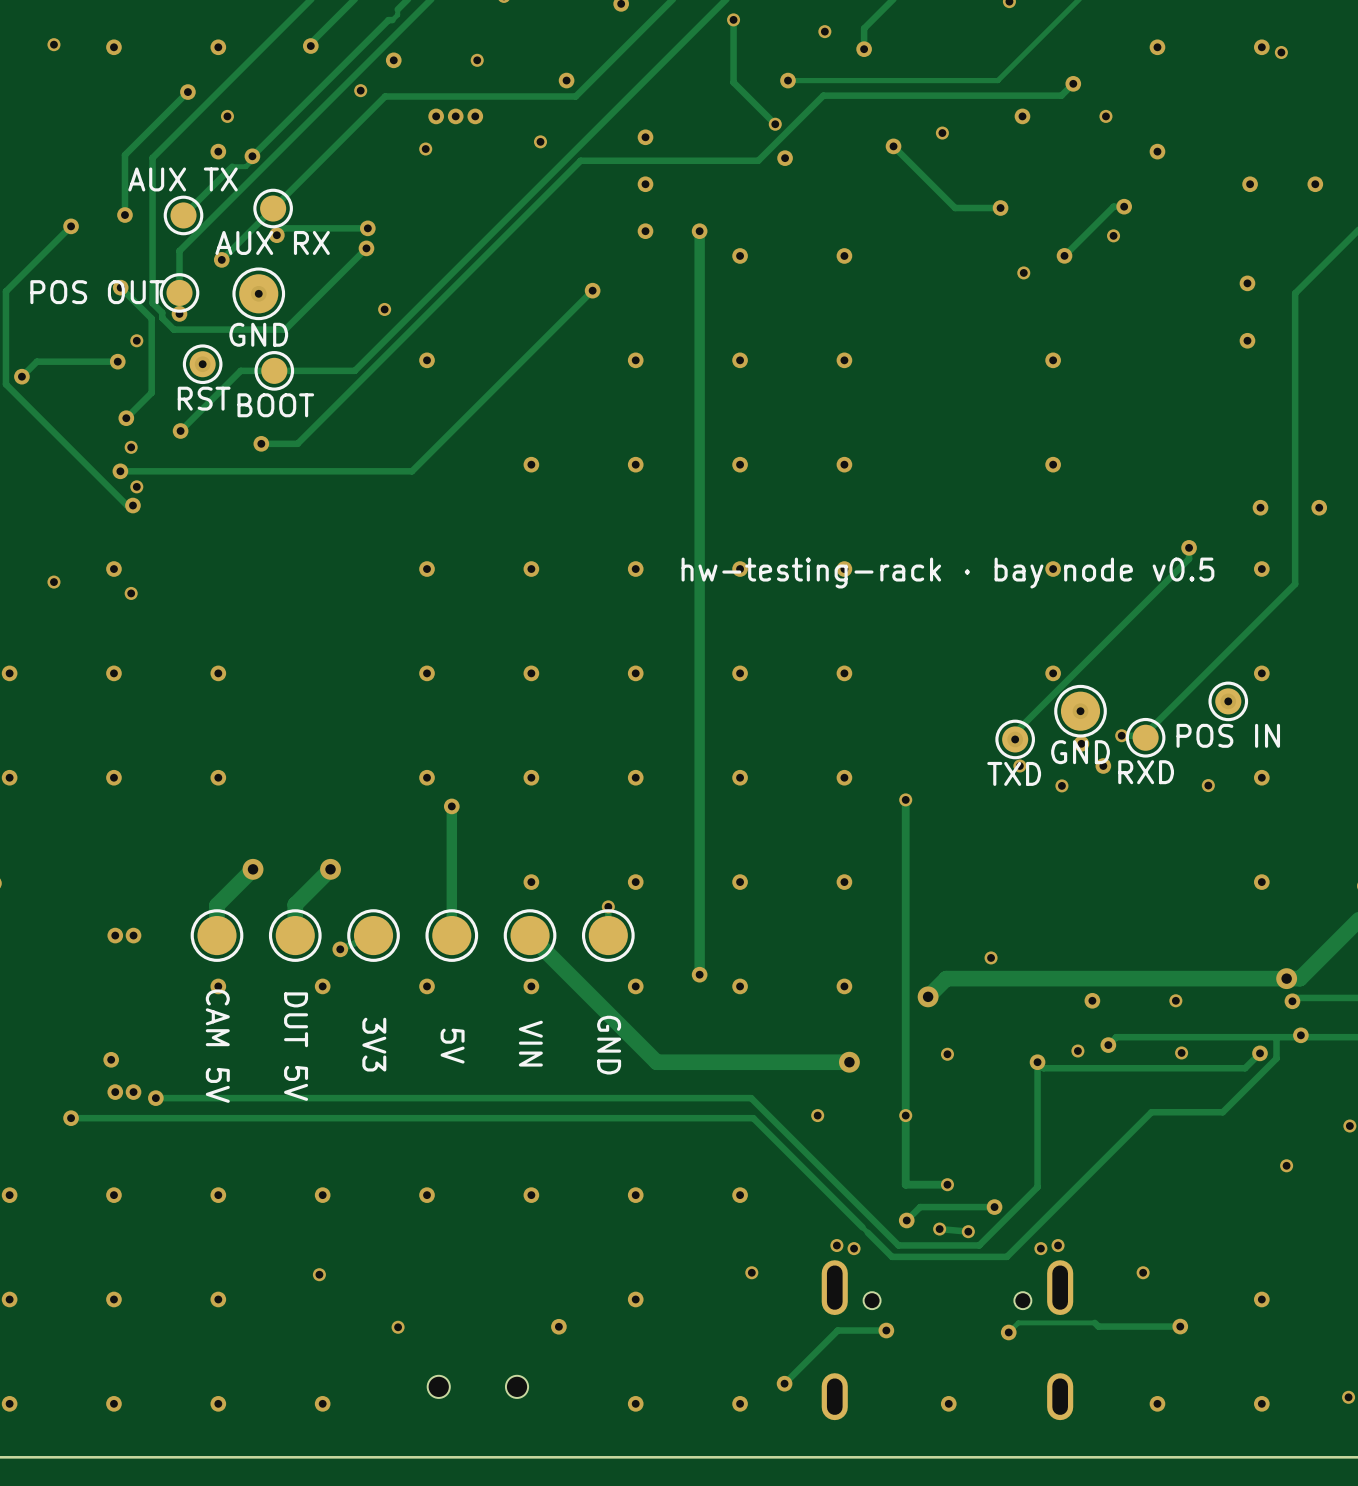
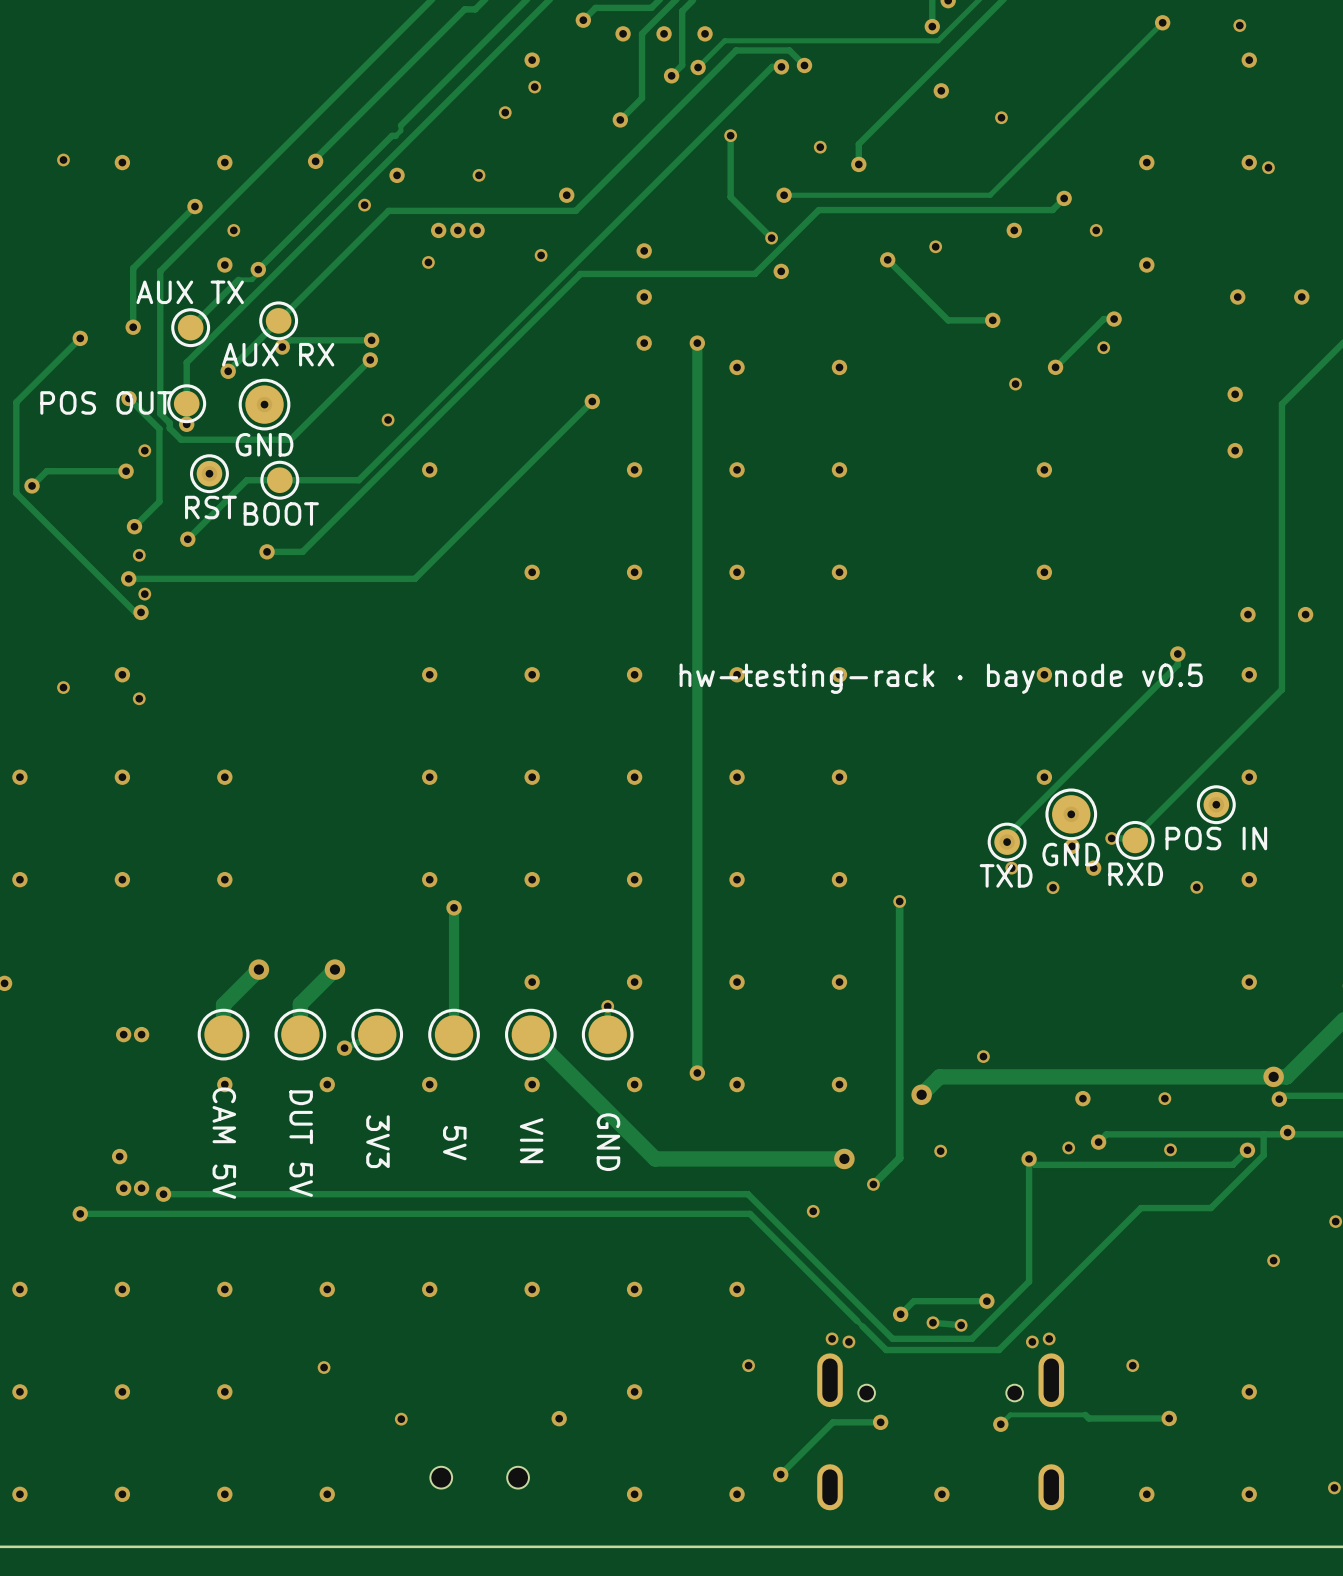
track: (905, 1061) (905, 1184) (947, 1184) -> (899, 1158) (873, 1184)
via position: (905, 1115) -> (873, 1184)
via: (947, 1184) -> none

